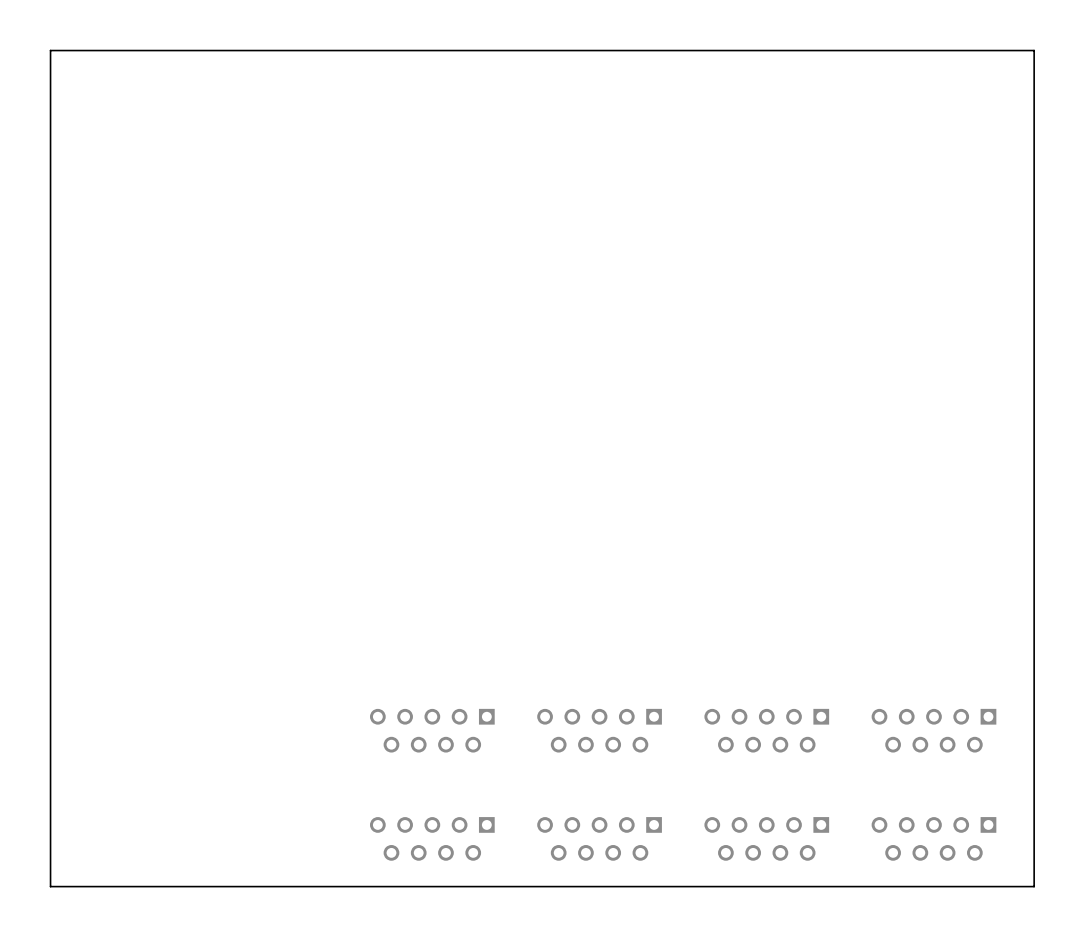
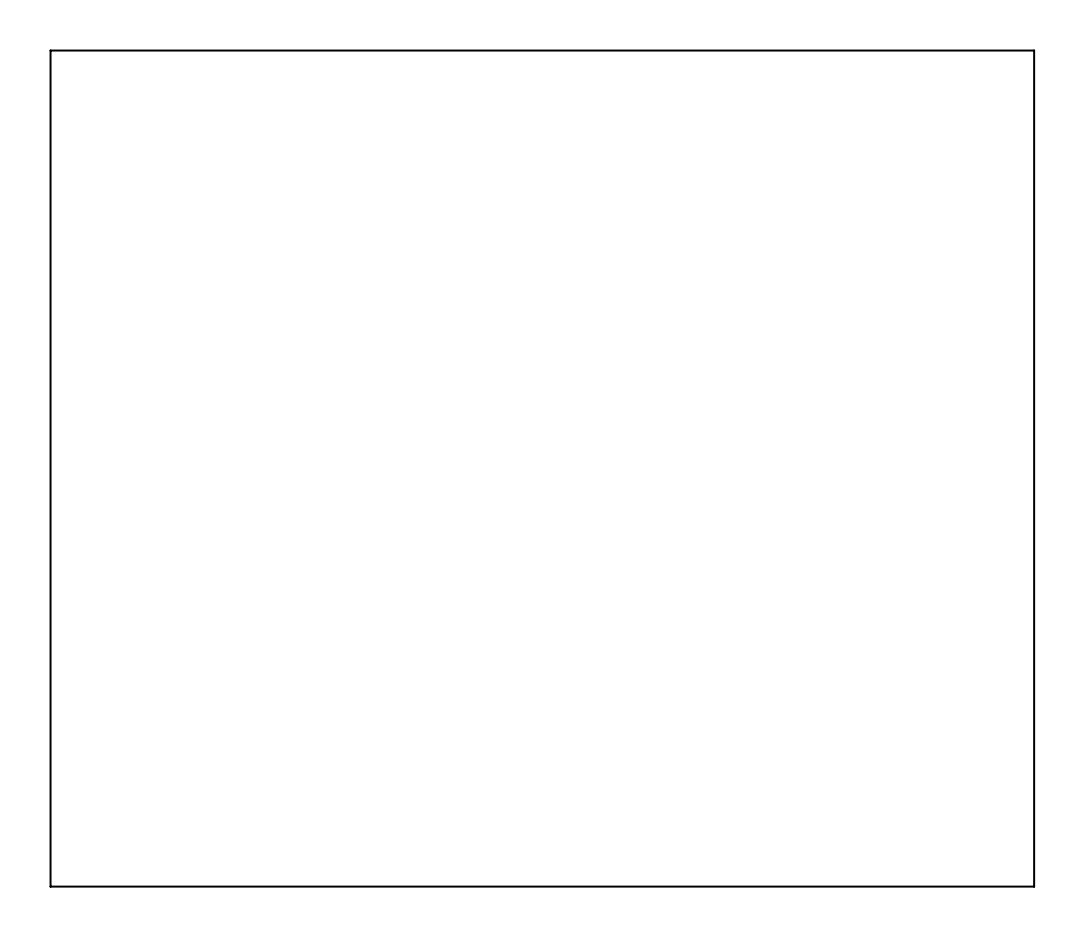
part: (432, 730) -> none
part: (599, 730) -> none
part: (766, 730) -> none
part: (933, 730) -> none
part: (432, 838) -> none
part: (599, 838) -> none
part: (766, 838) -> none
part: (933, 838) -> none

